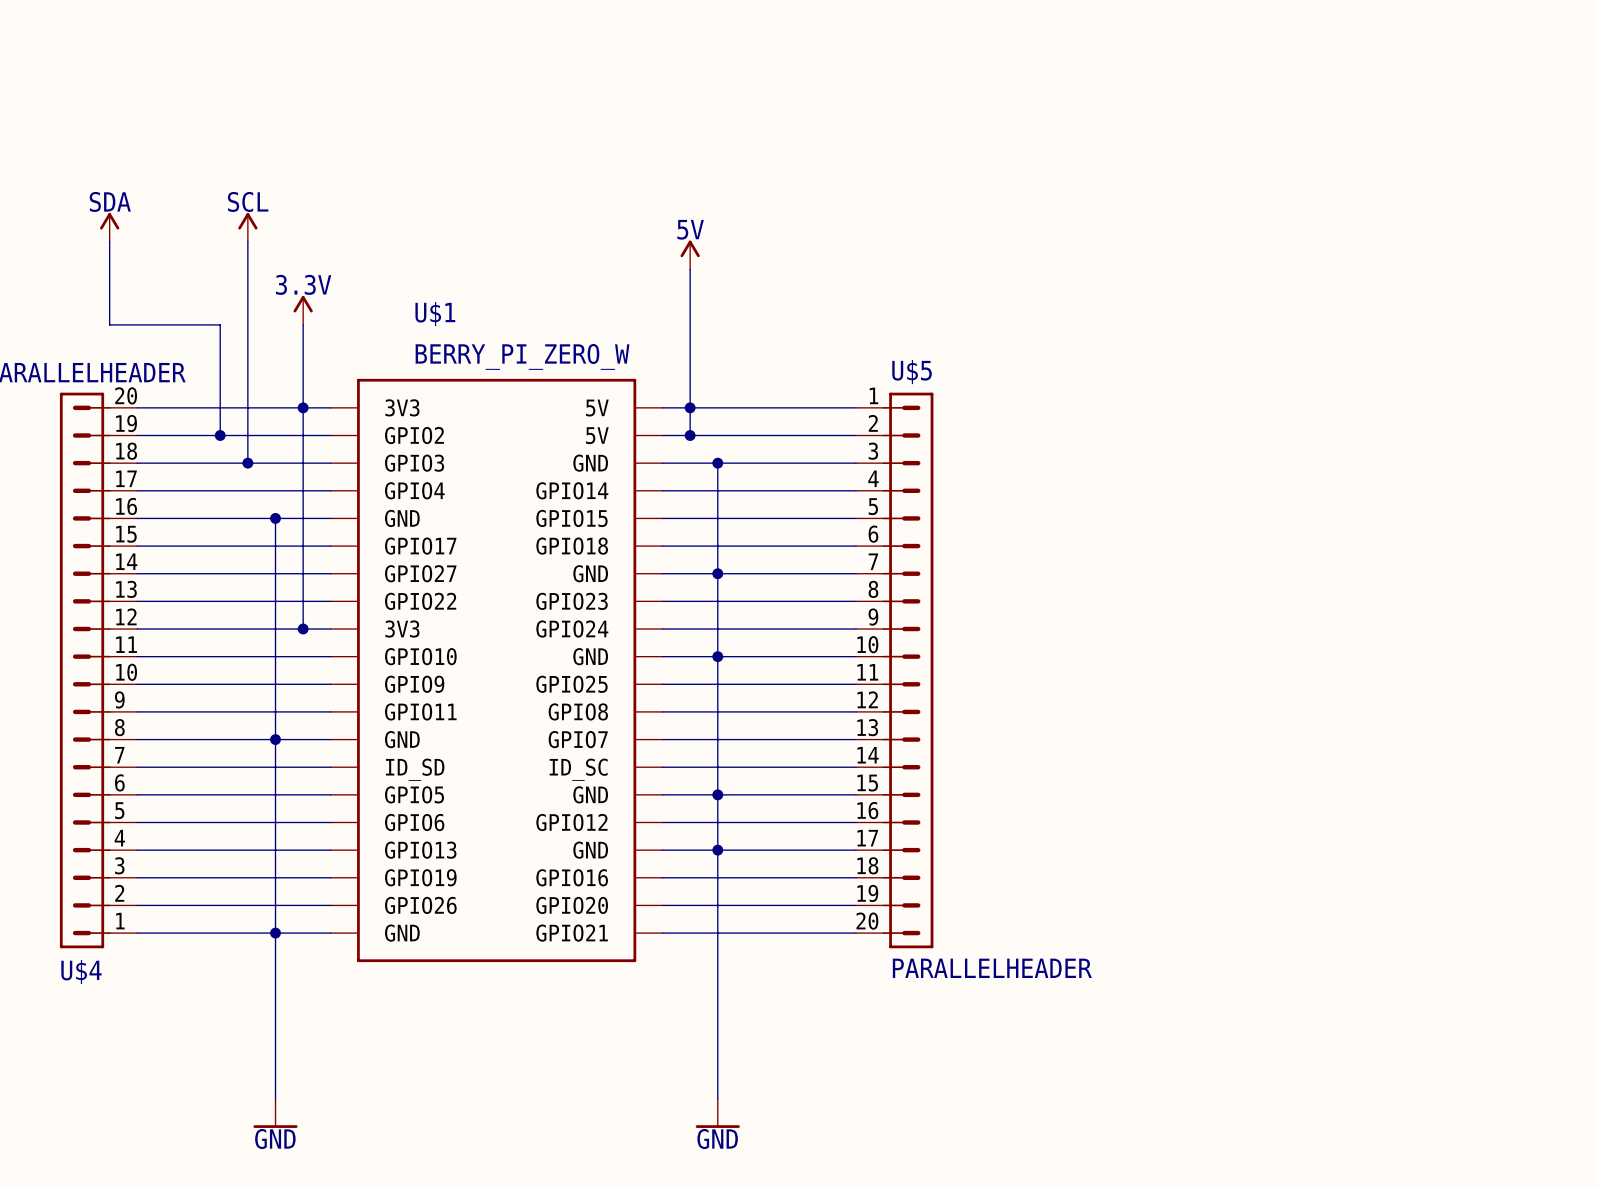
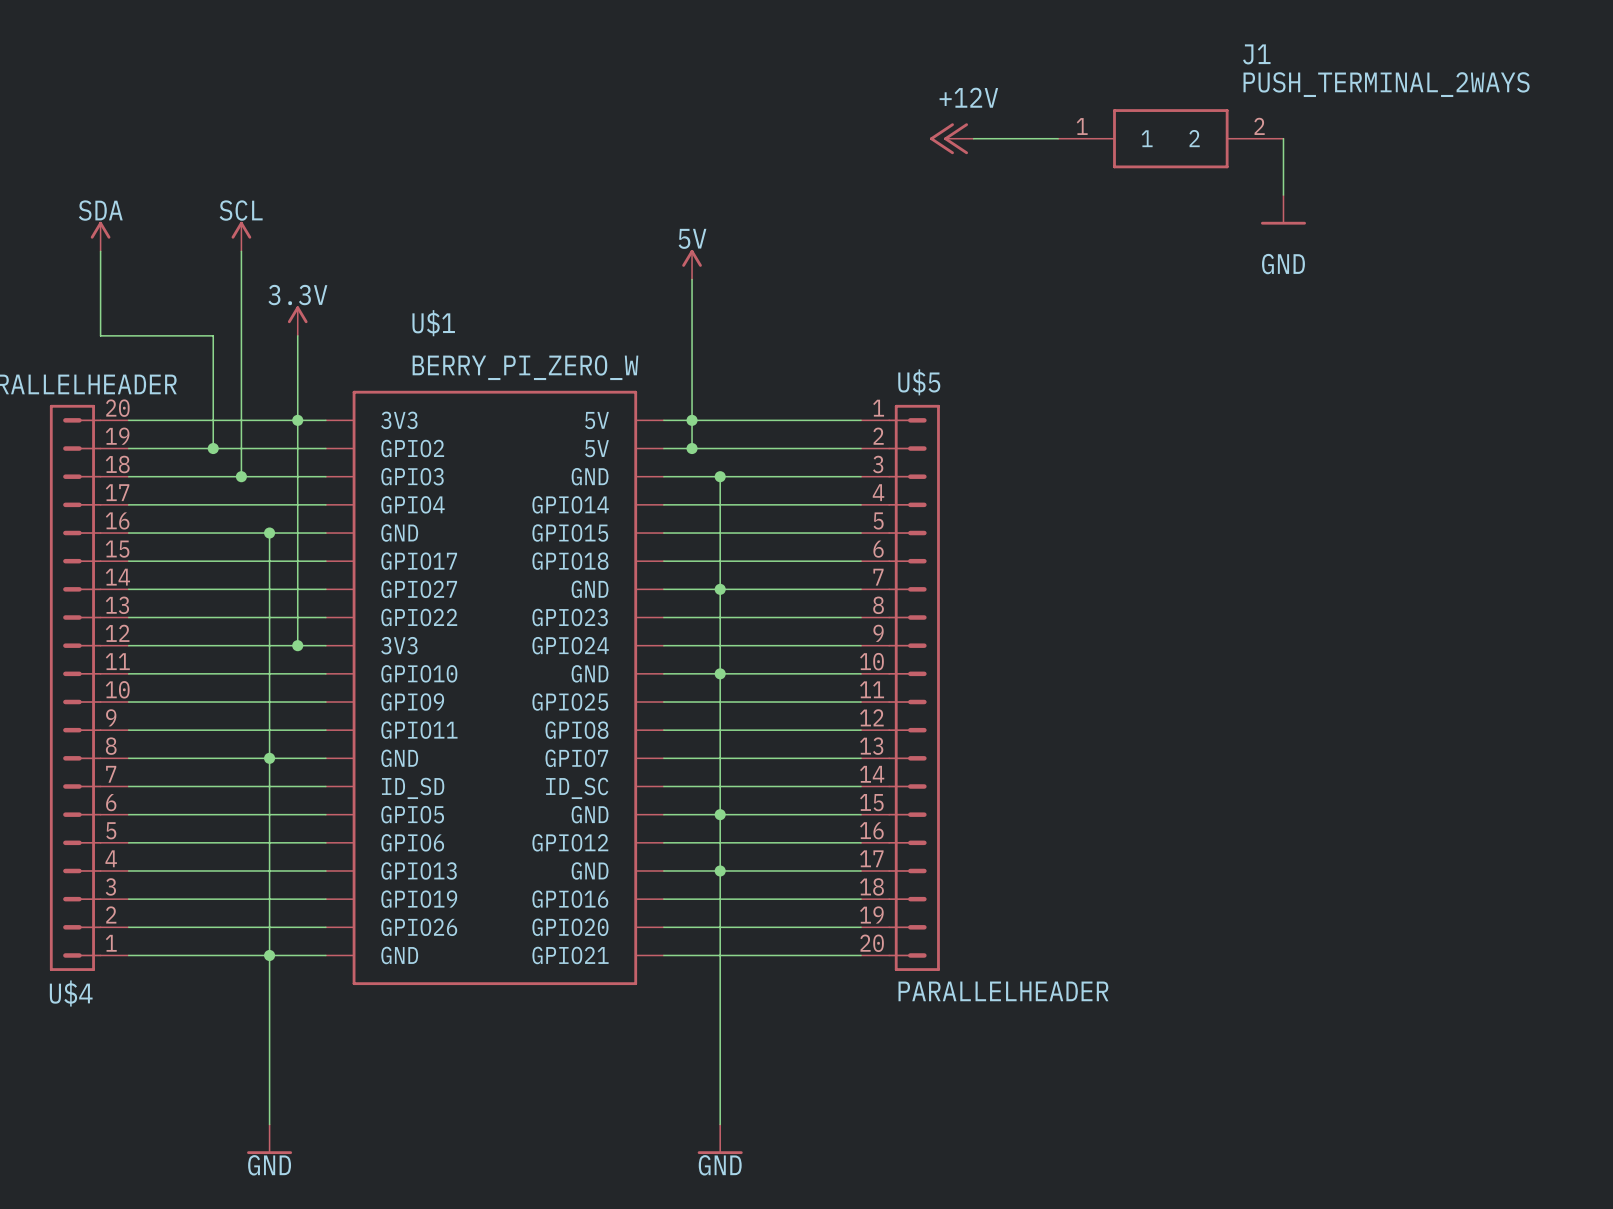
power symbol: none -> +12V (951, 138)
wire: none -> (973, 138) (1058, 138)
J1: none -> PUSH_TERMINAL_2WAYS (1170, 138)
wire: none -> (1283, 138) (1283, 195)
power symbol: none -> GND (1283, 209)

